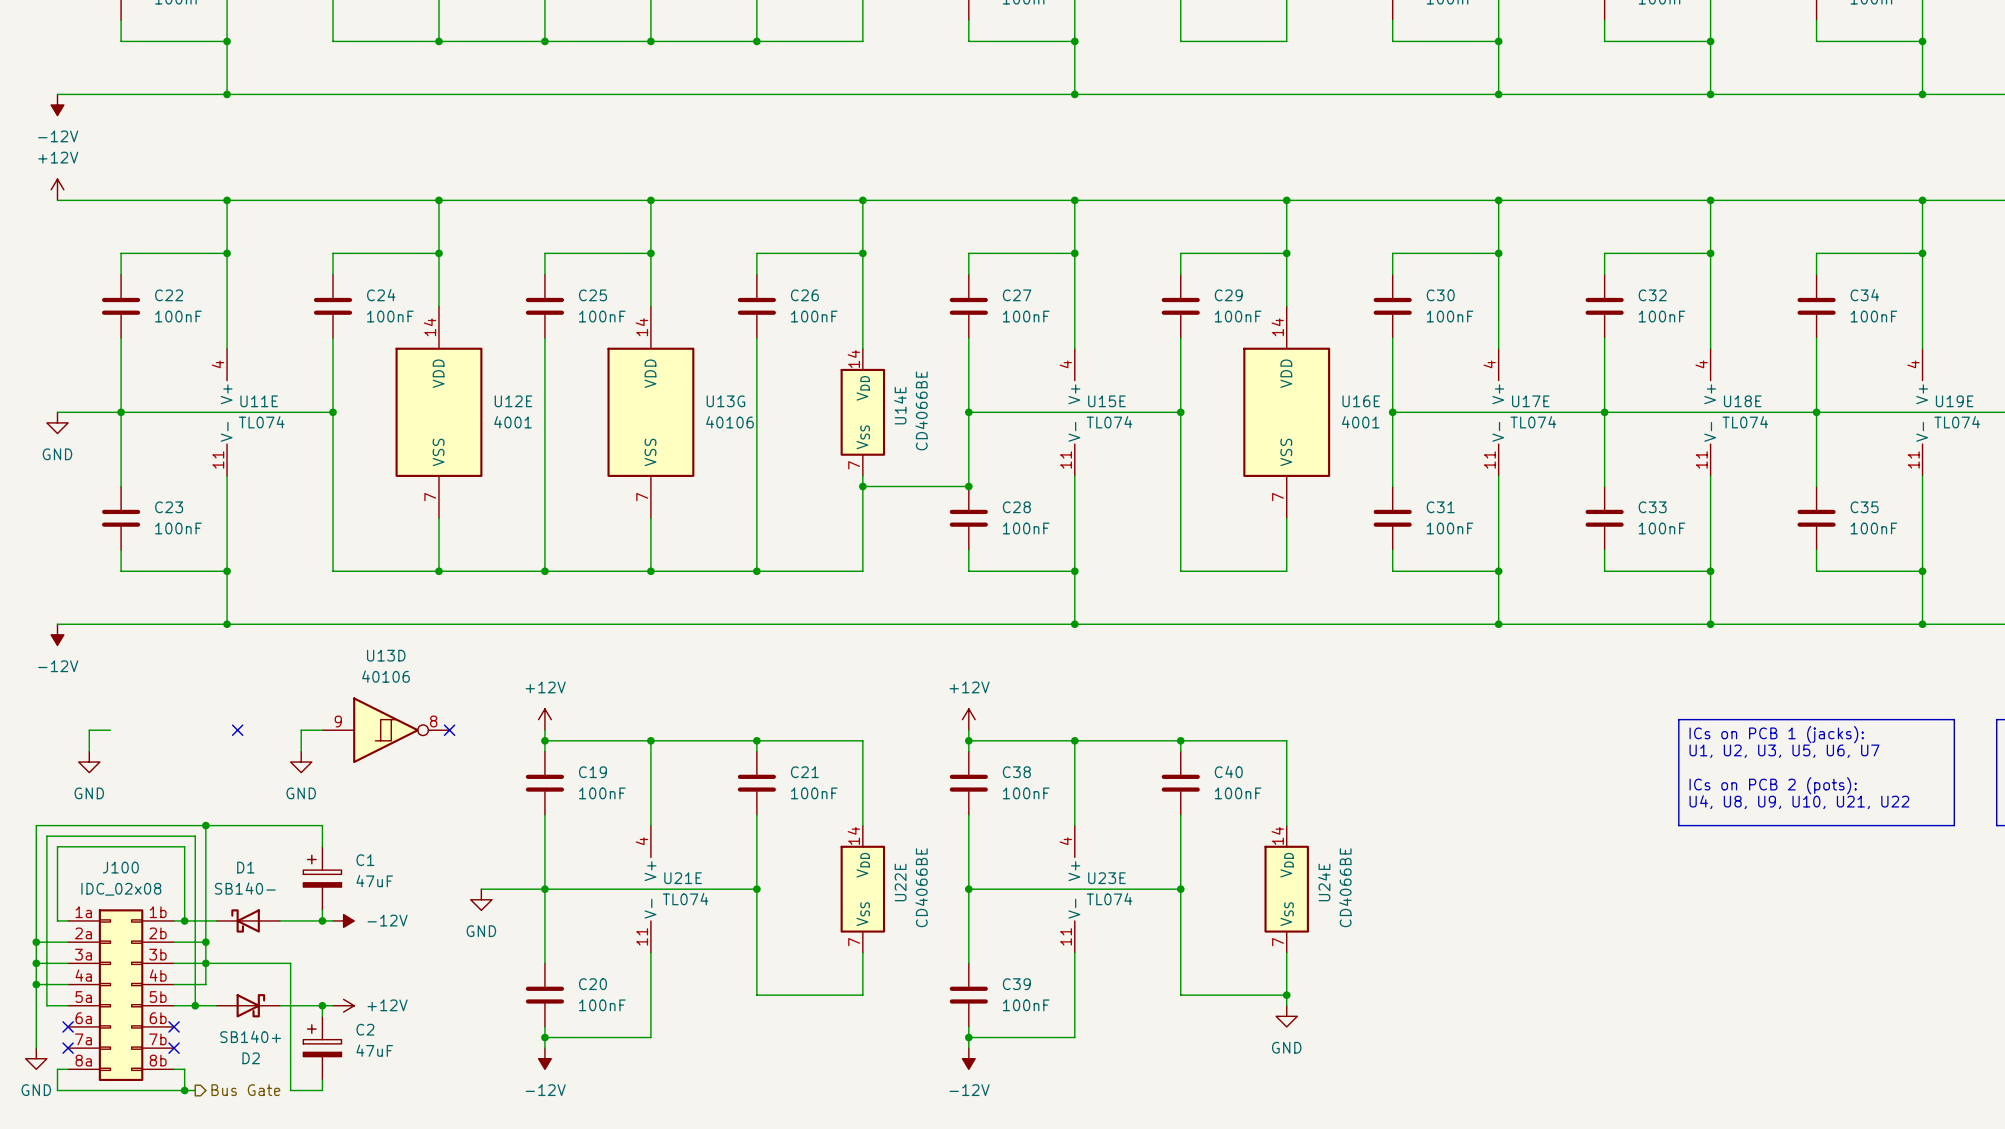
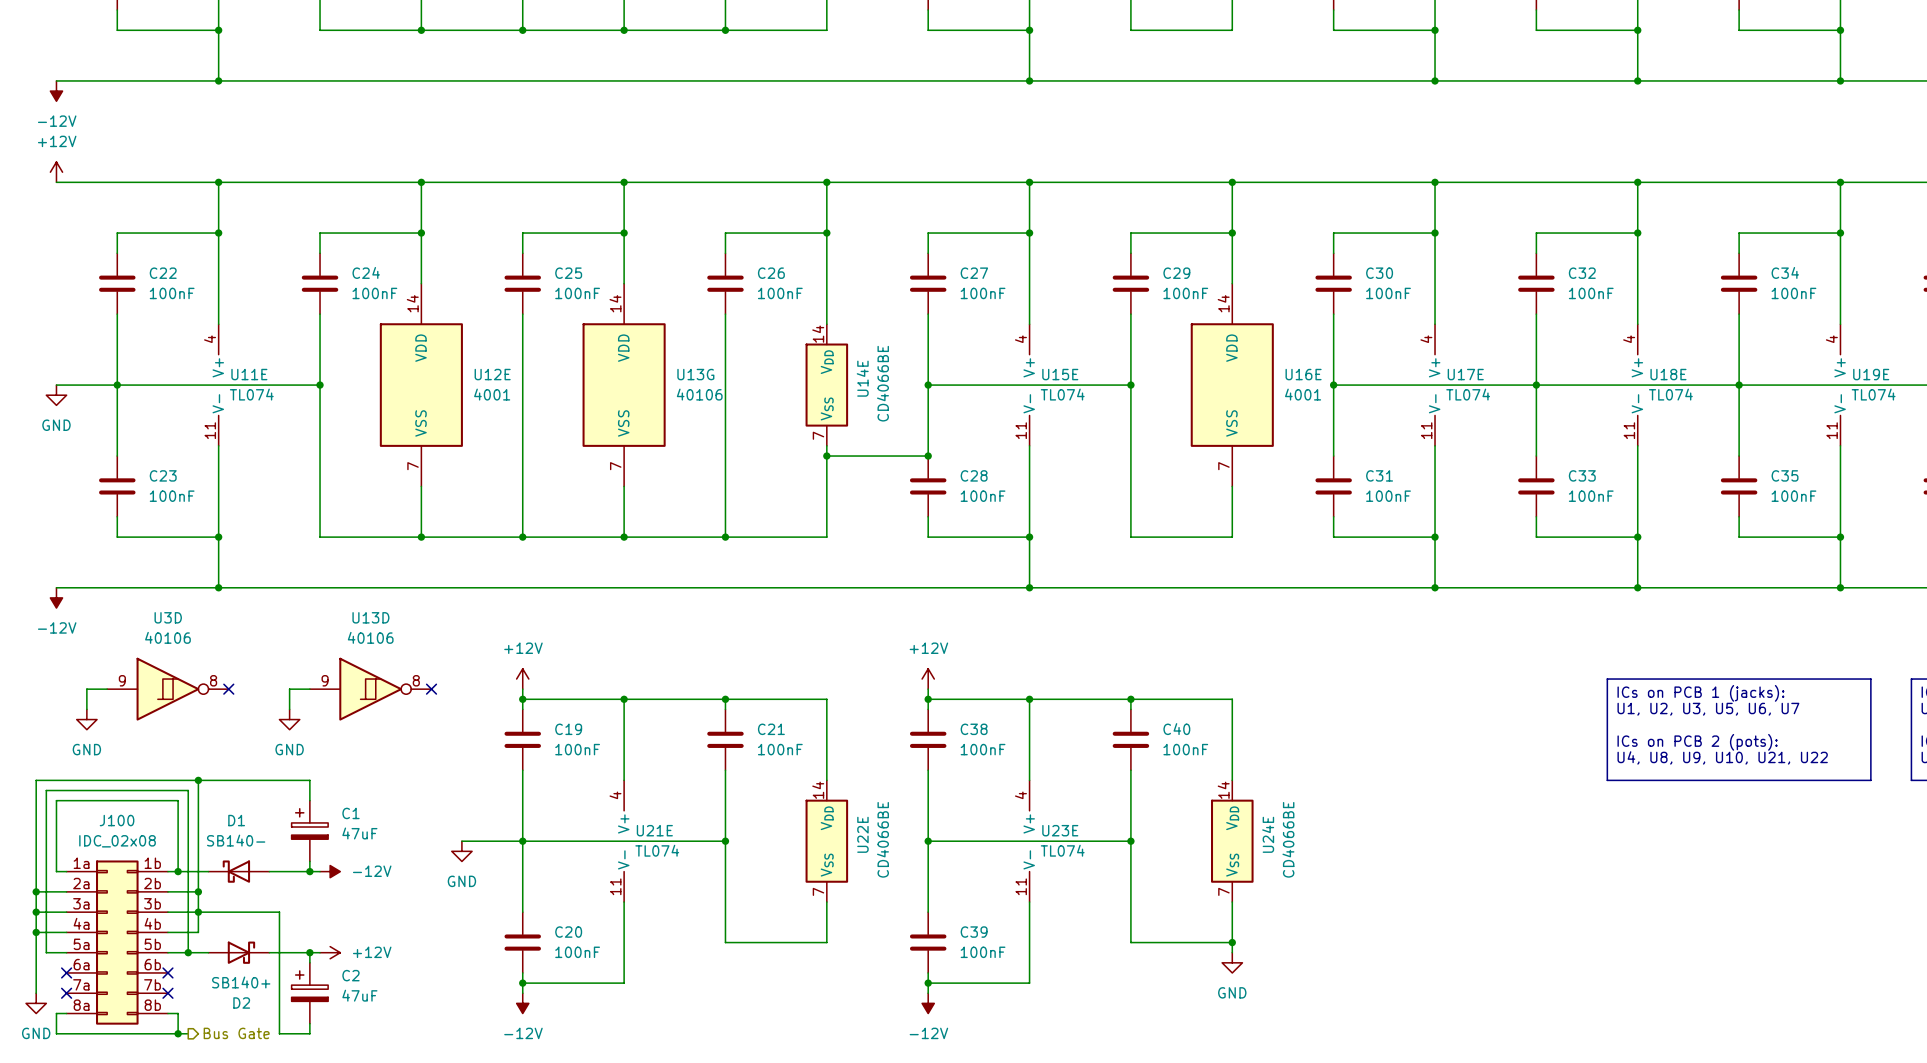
U3D: none -> 40106 (167, 689)

